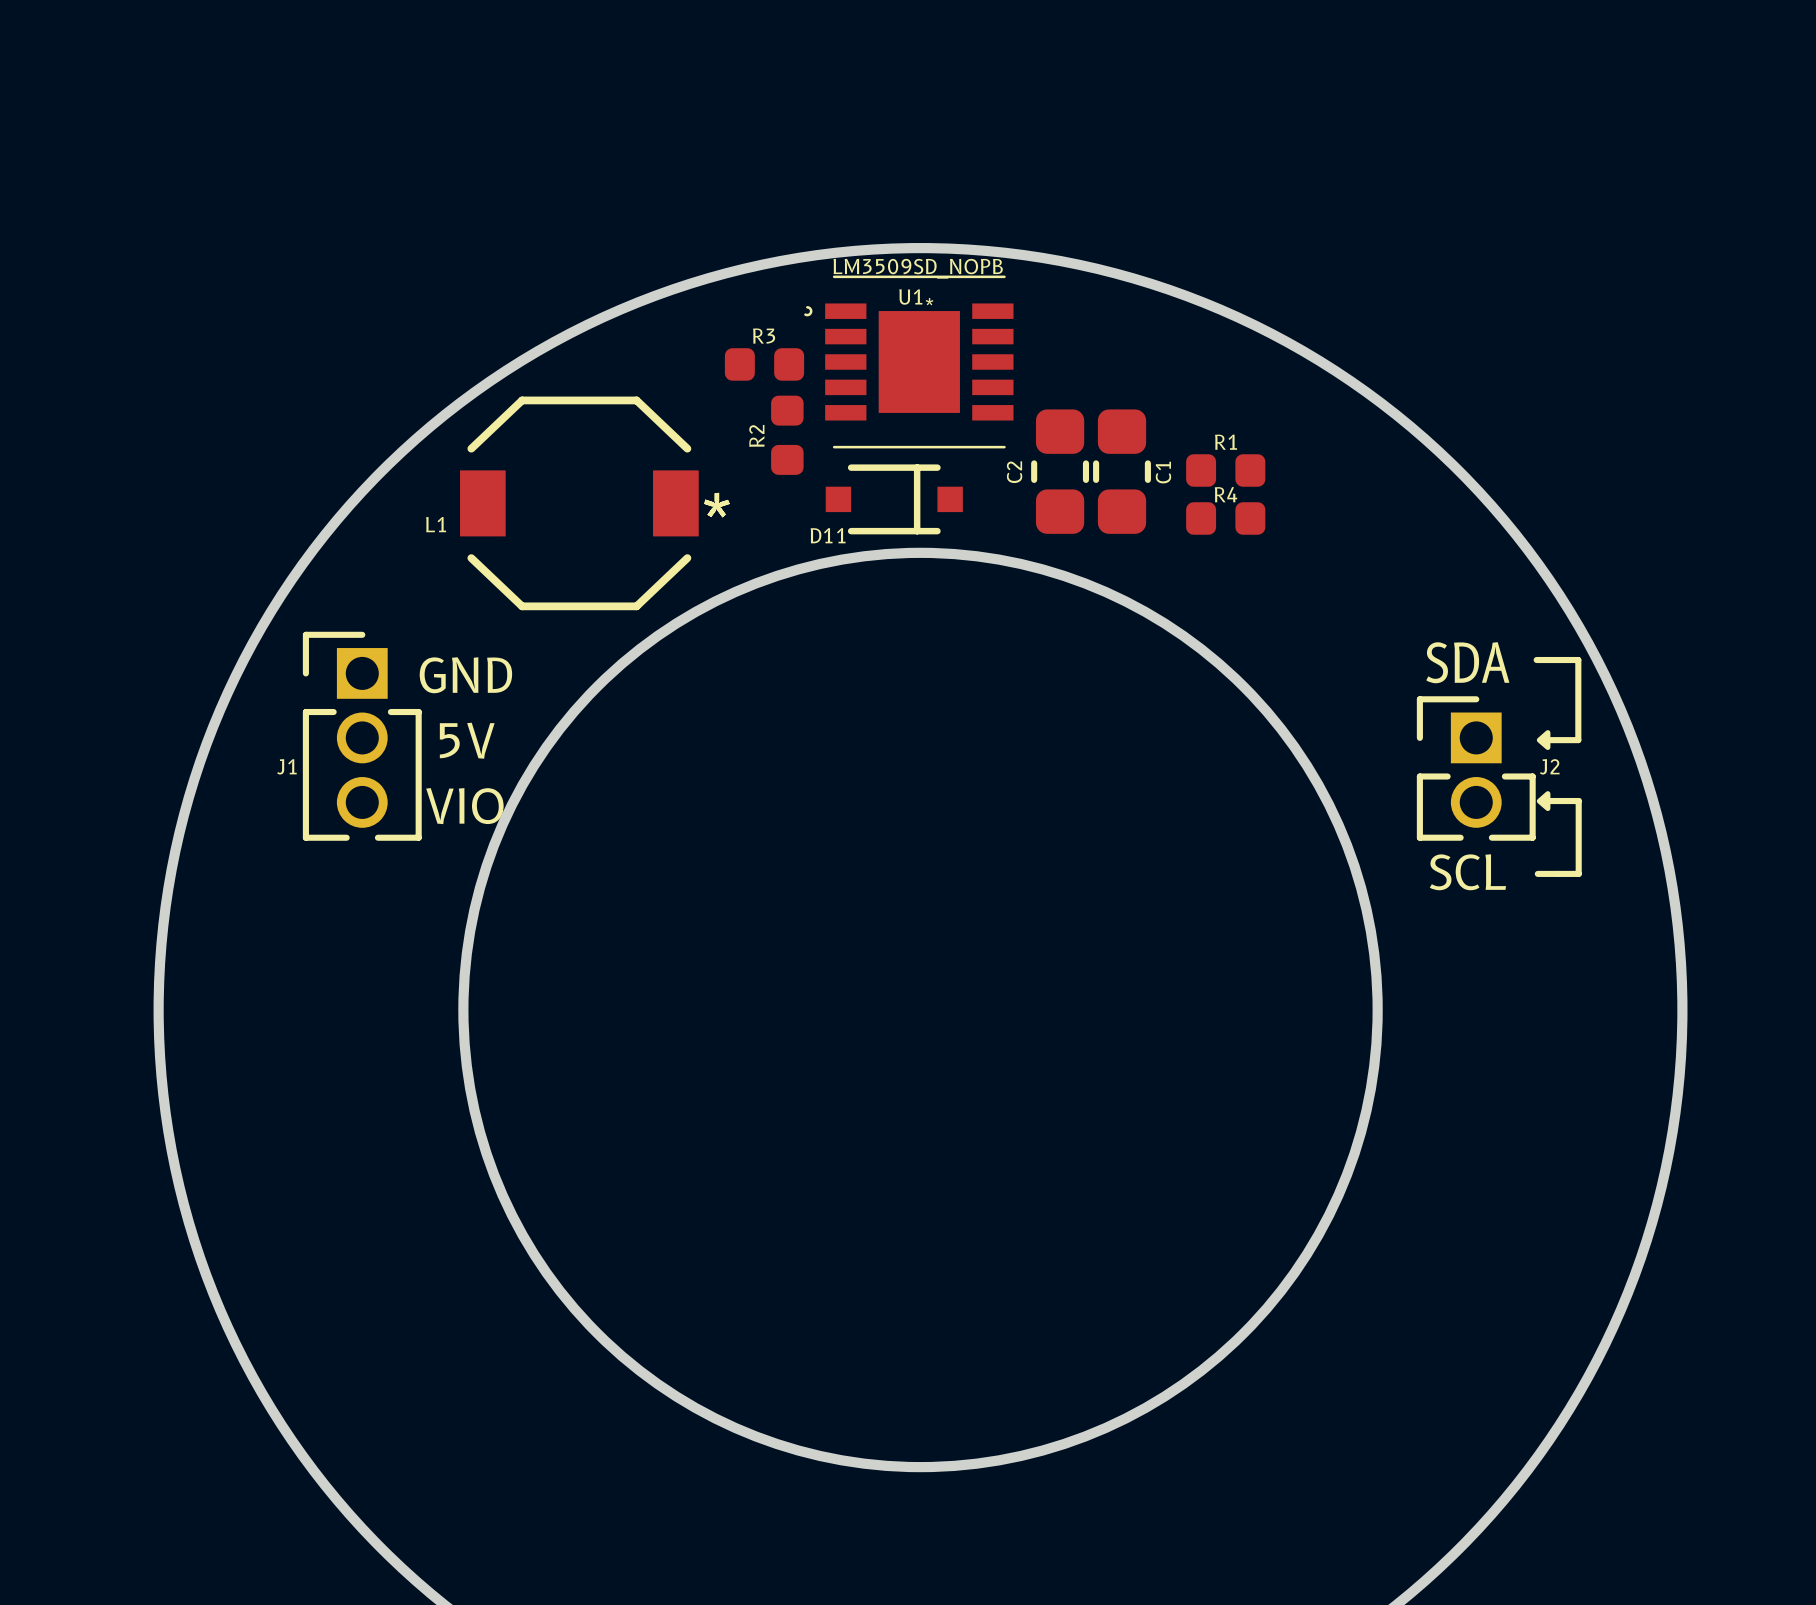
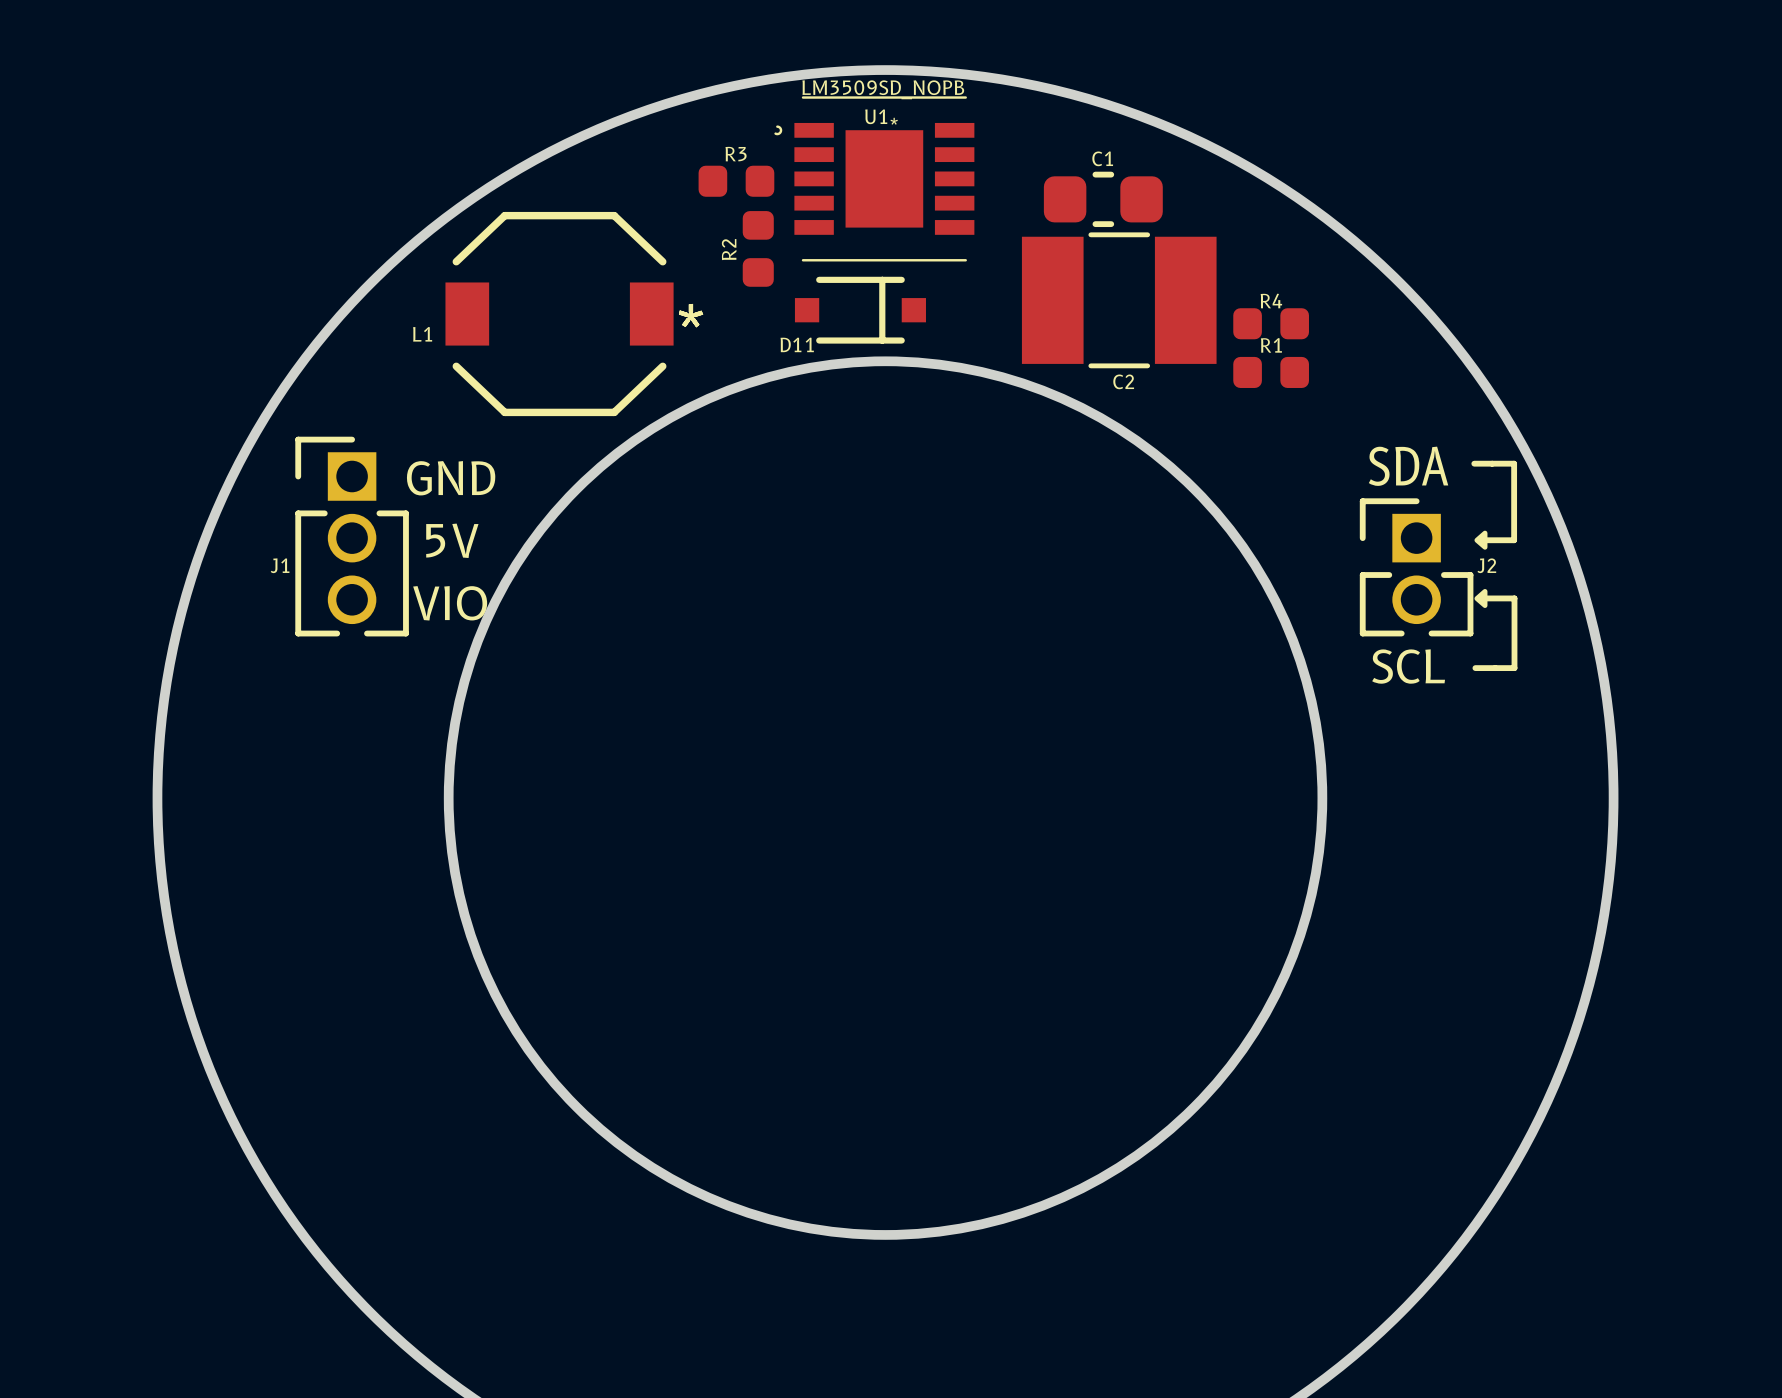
C2 footprint: [1031, 409, 1090, 534] -> [1021, 232, 1217, 369]
R1 position: (1225, 470) -> (1271, 372)
C1 rotation: 0° (1122, 471) -> 90° clockwise (1103, 199)
C1 position: (1122, 471) -> (1103, 199)
R4 position: (1225, 518) -> (1271, 323)

